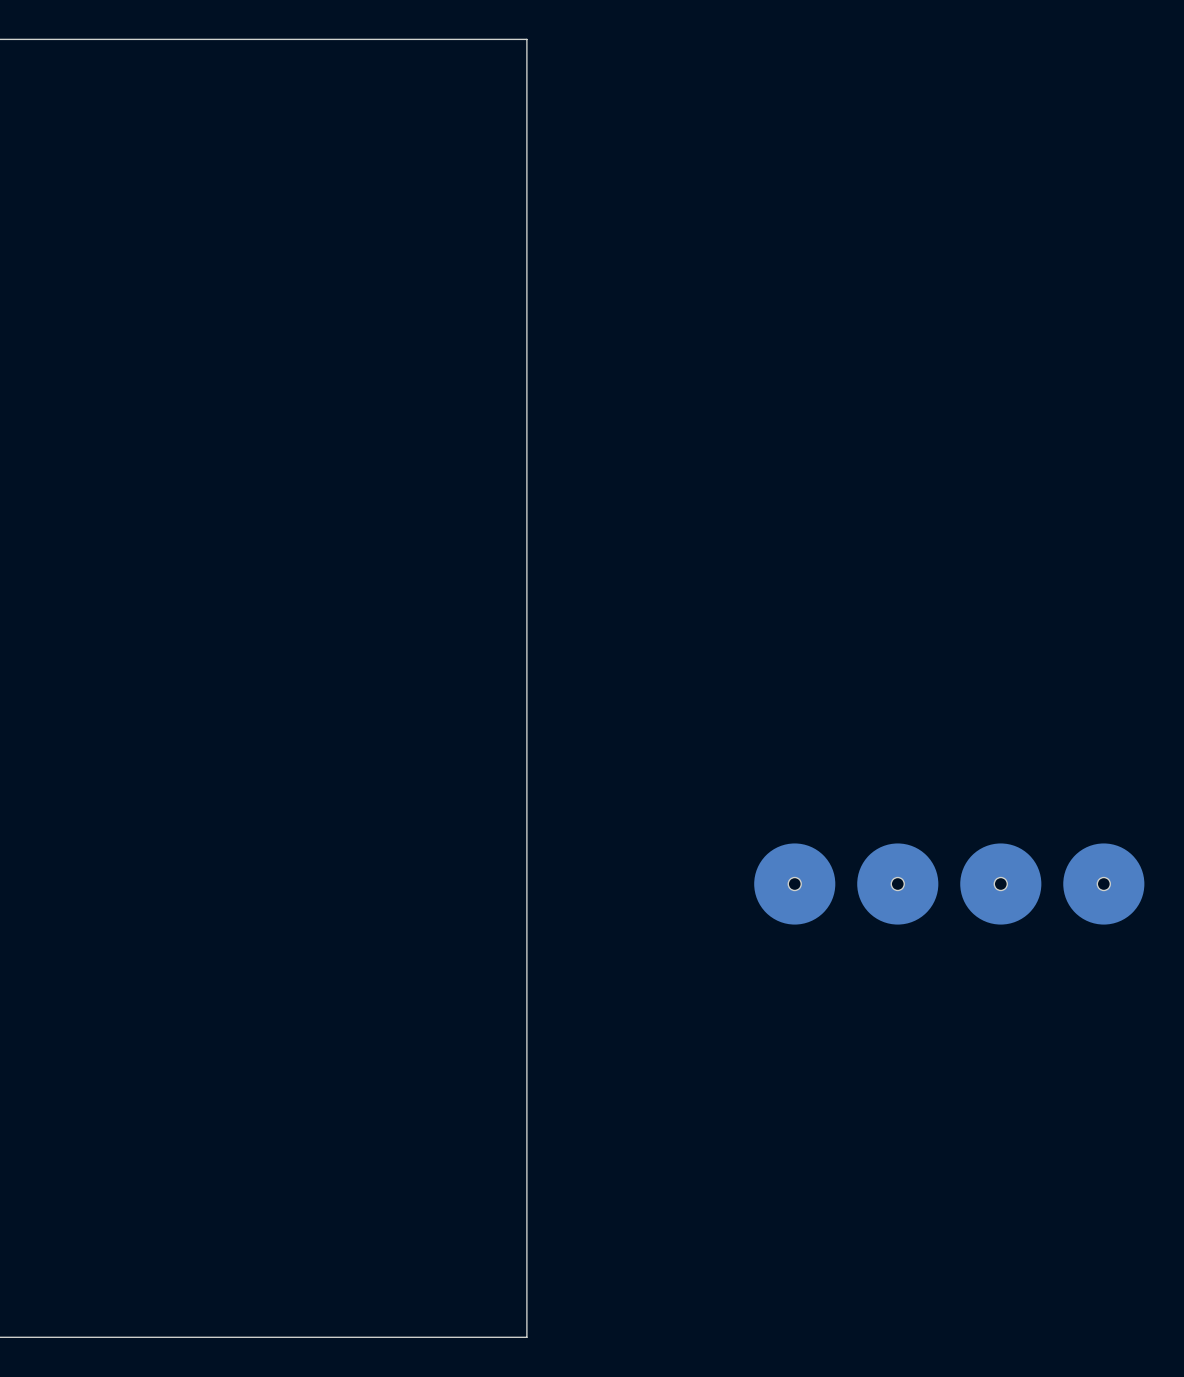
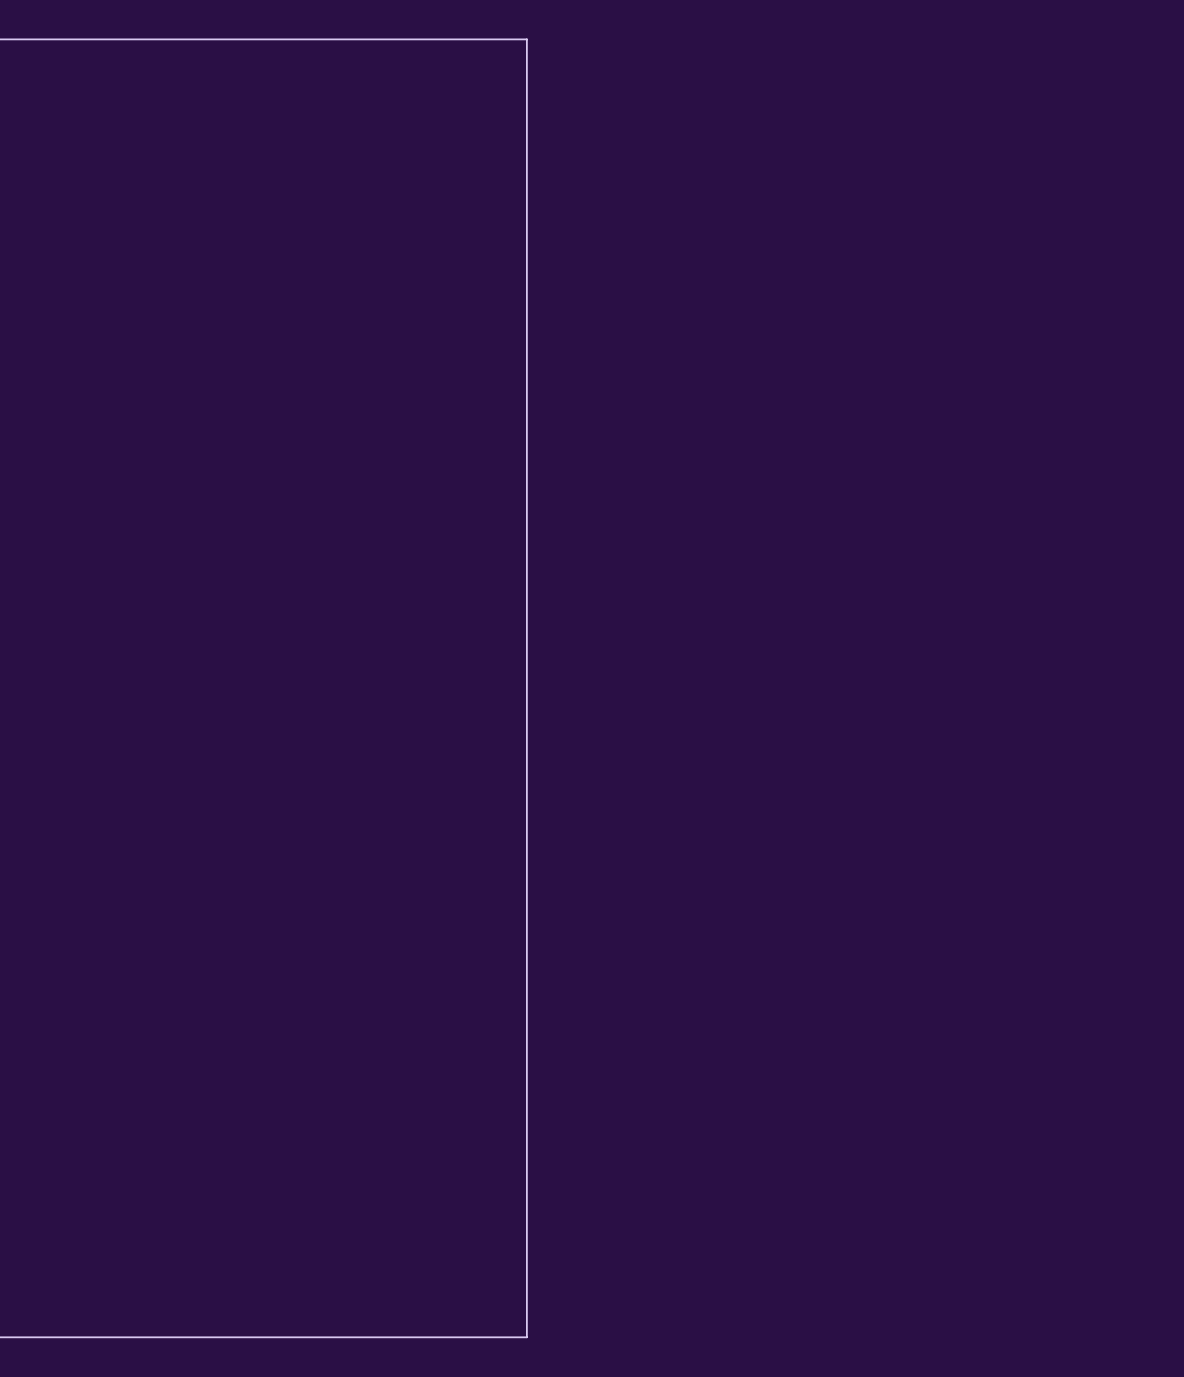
part: (794, 884) -> none
part: (897, 884) -> none
part: (1000, 884) -> none
part: (1103, 884) -> none

